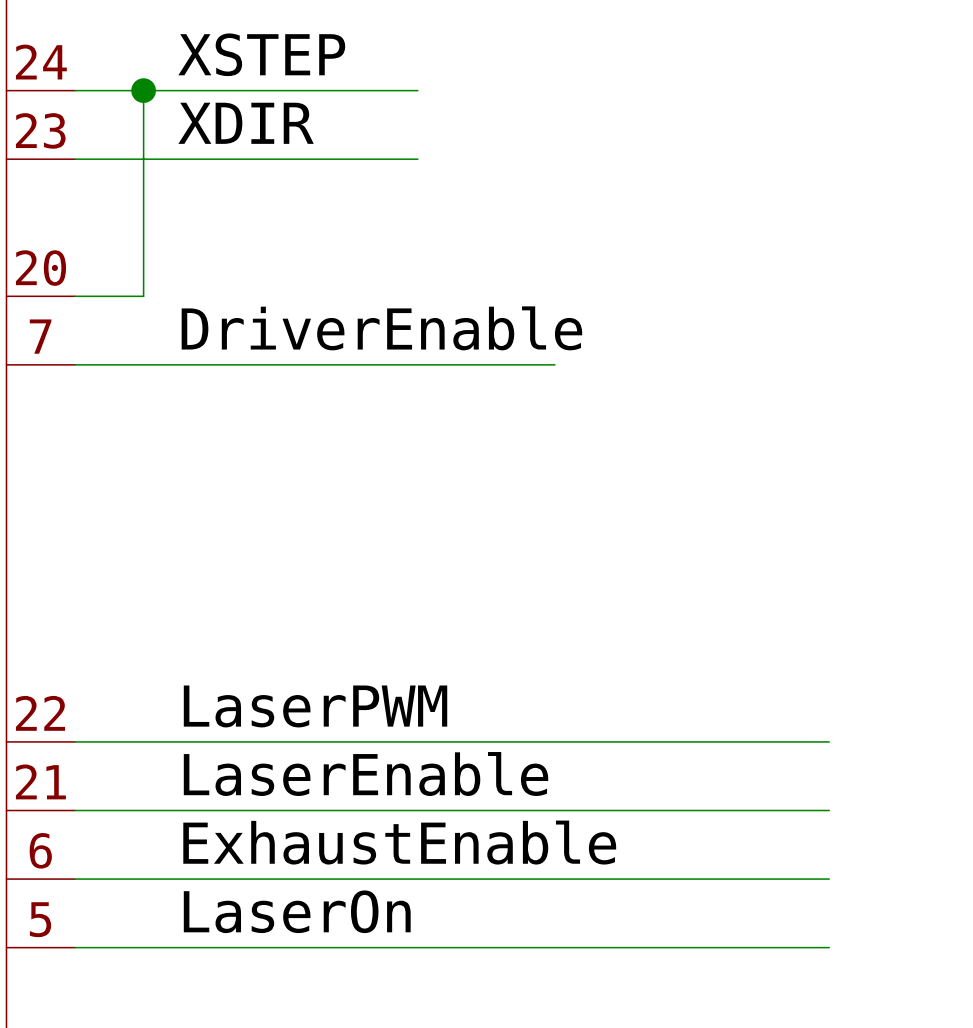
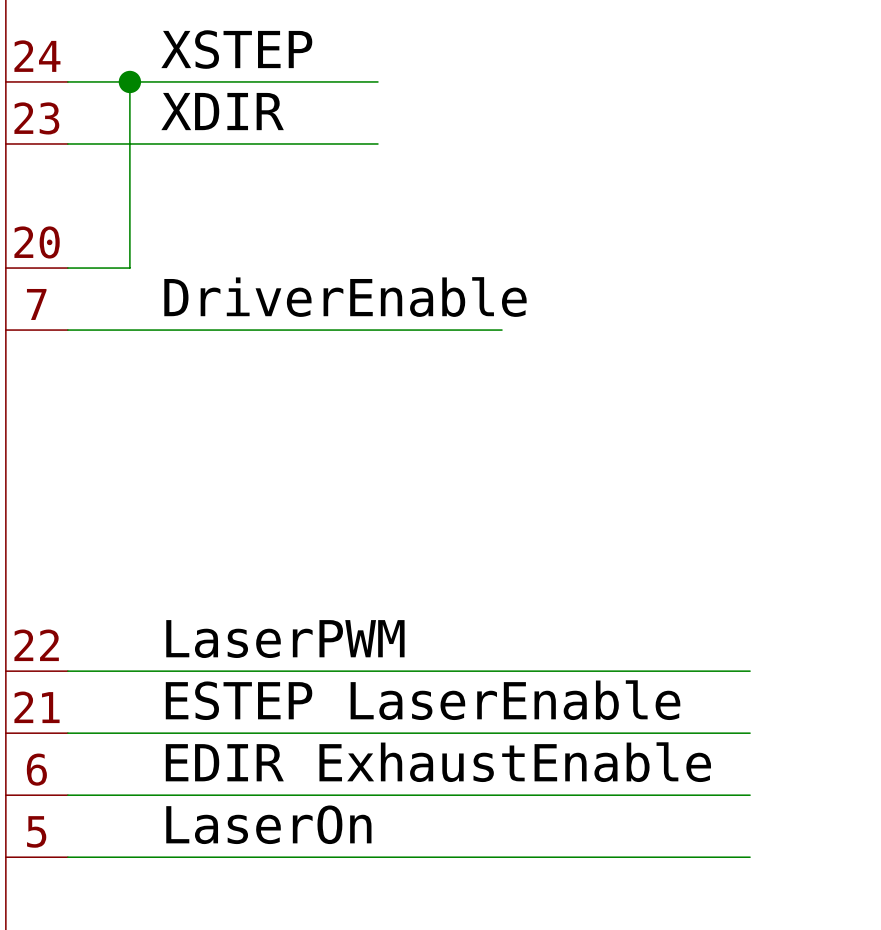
label: LaserEnable (366, 774) -> ESTEP LaserEnable (423, 700)
label: ExhaustEnable (399, 842) -> EDIR ExhaustEnable (438, 762)

